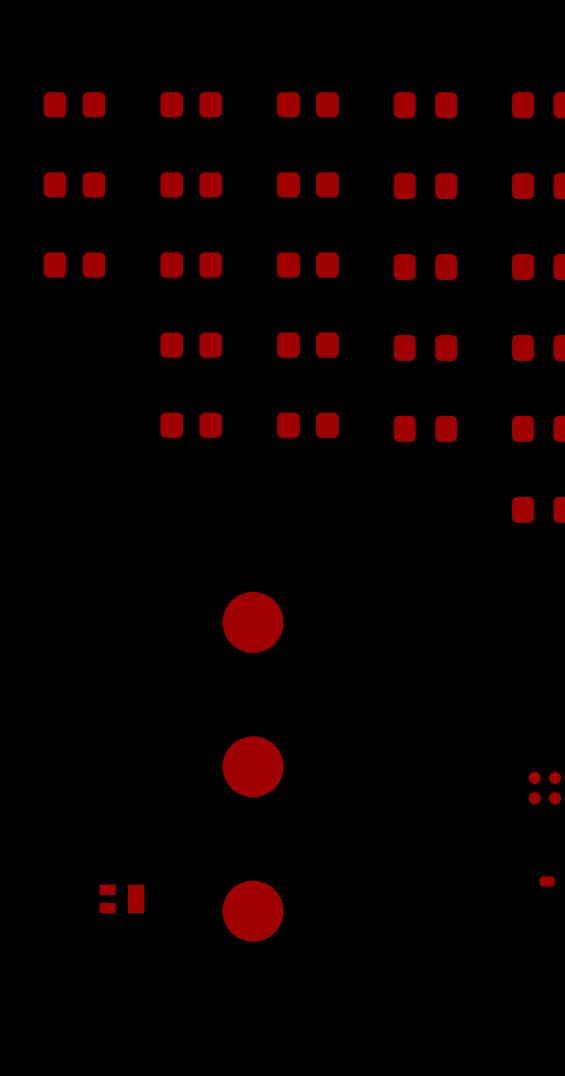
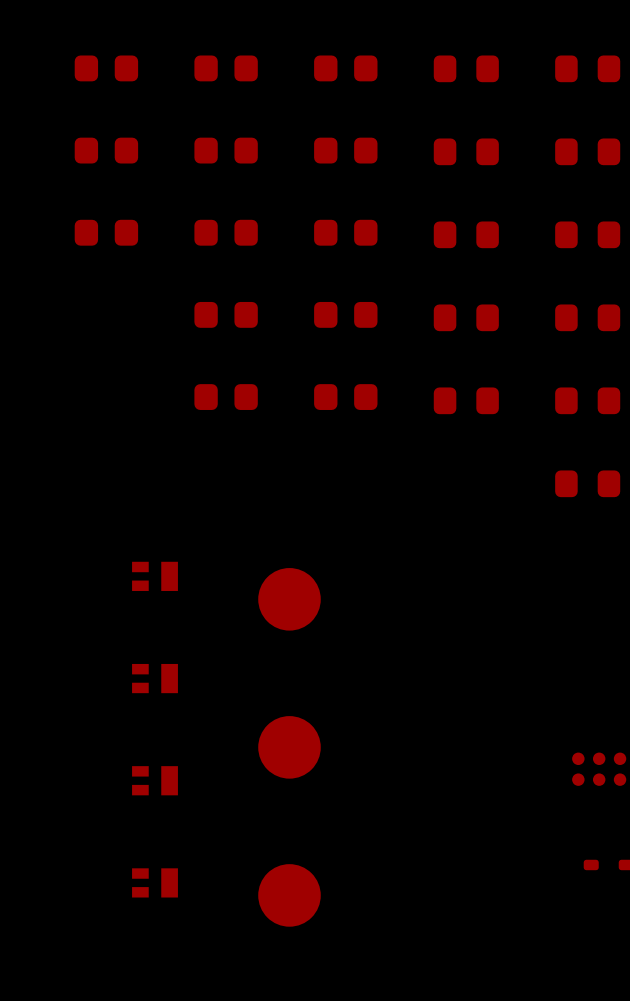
part: none -> (154, 576)
part: none -> (154, 678)
part: none -> (154, 780)

